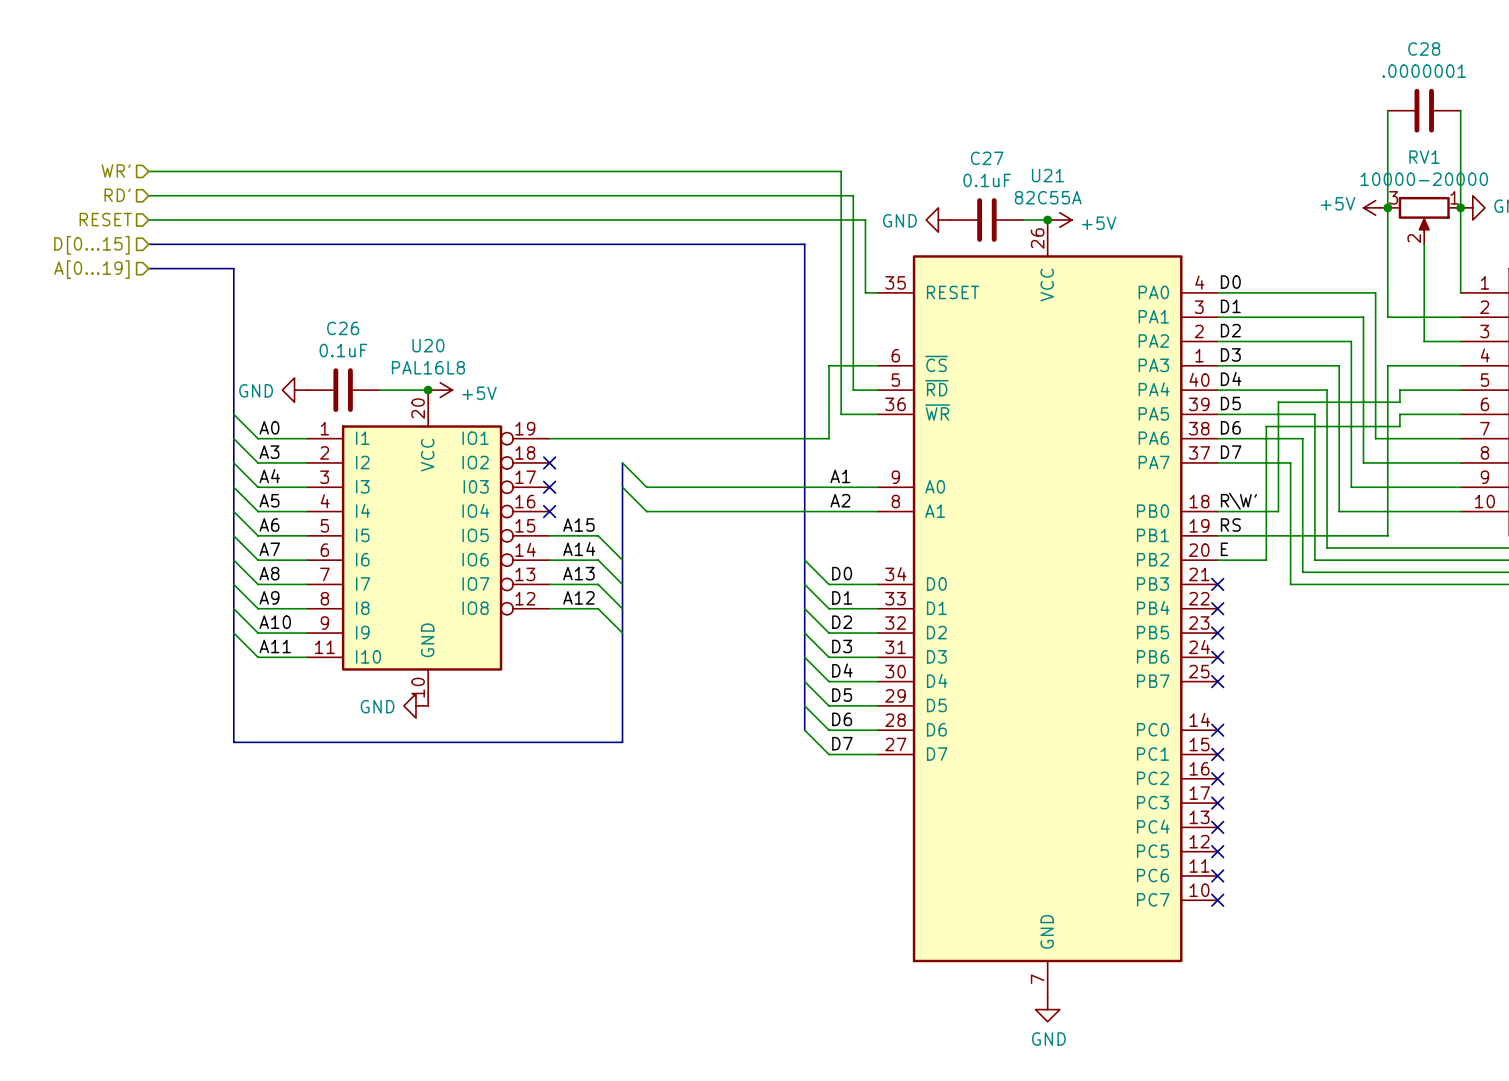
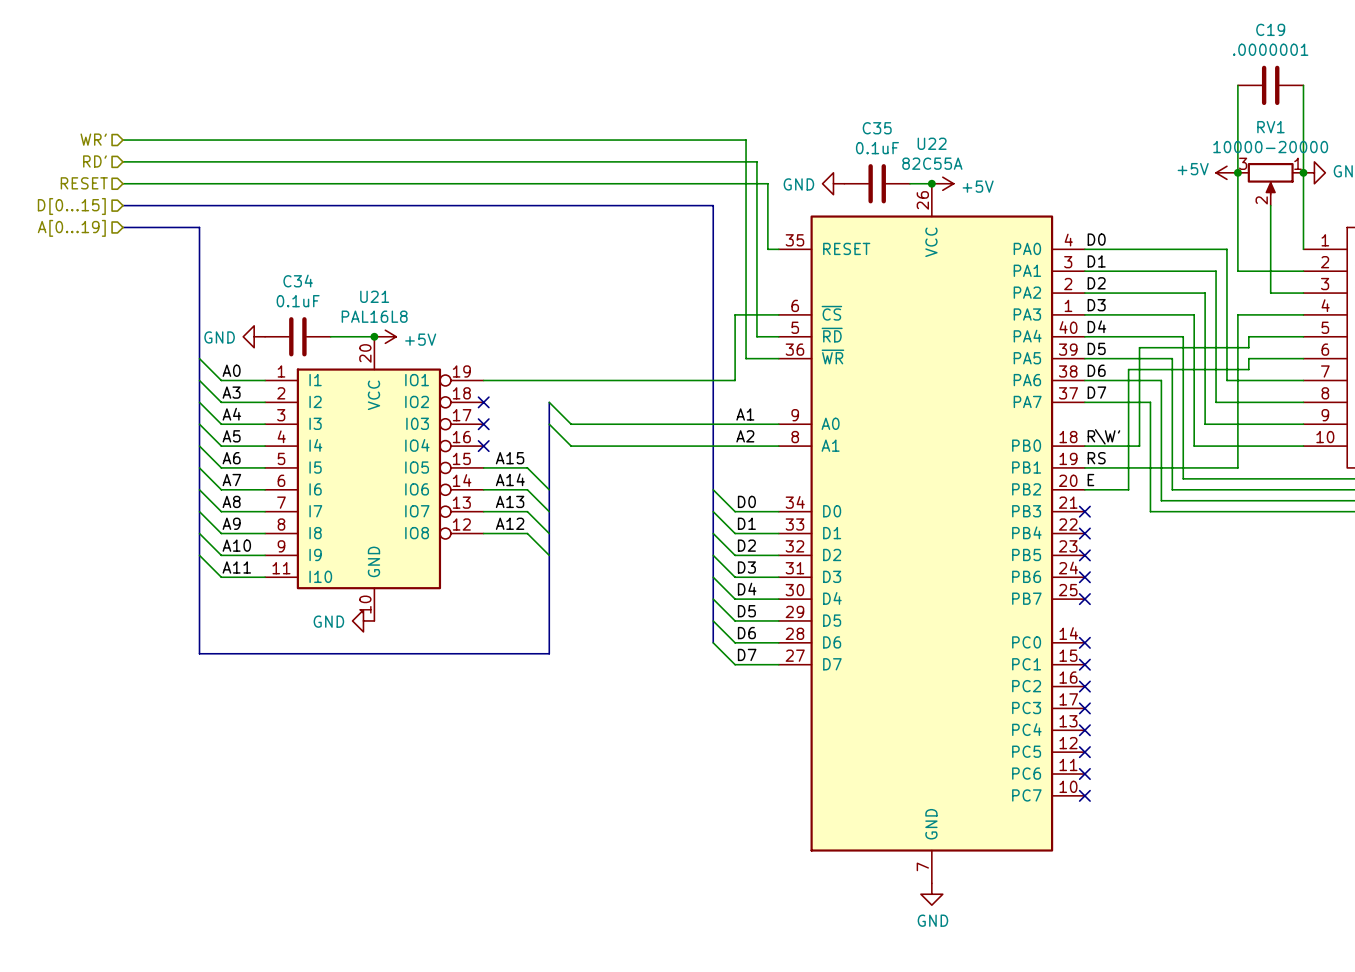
C28 name: C28 (1424, 49) -> C19 (1270, 29)
C27 name: C27 (987, 158) -> C35 (877, 128)
U21 name: U21 (1047, 175) -> U22 (932, 143)
C26 name: C26 (343, 328) -> C34 (298, 281)
U20 name: U20 (428, 345) -> U21 (374, 296)

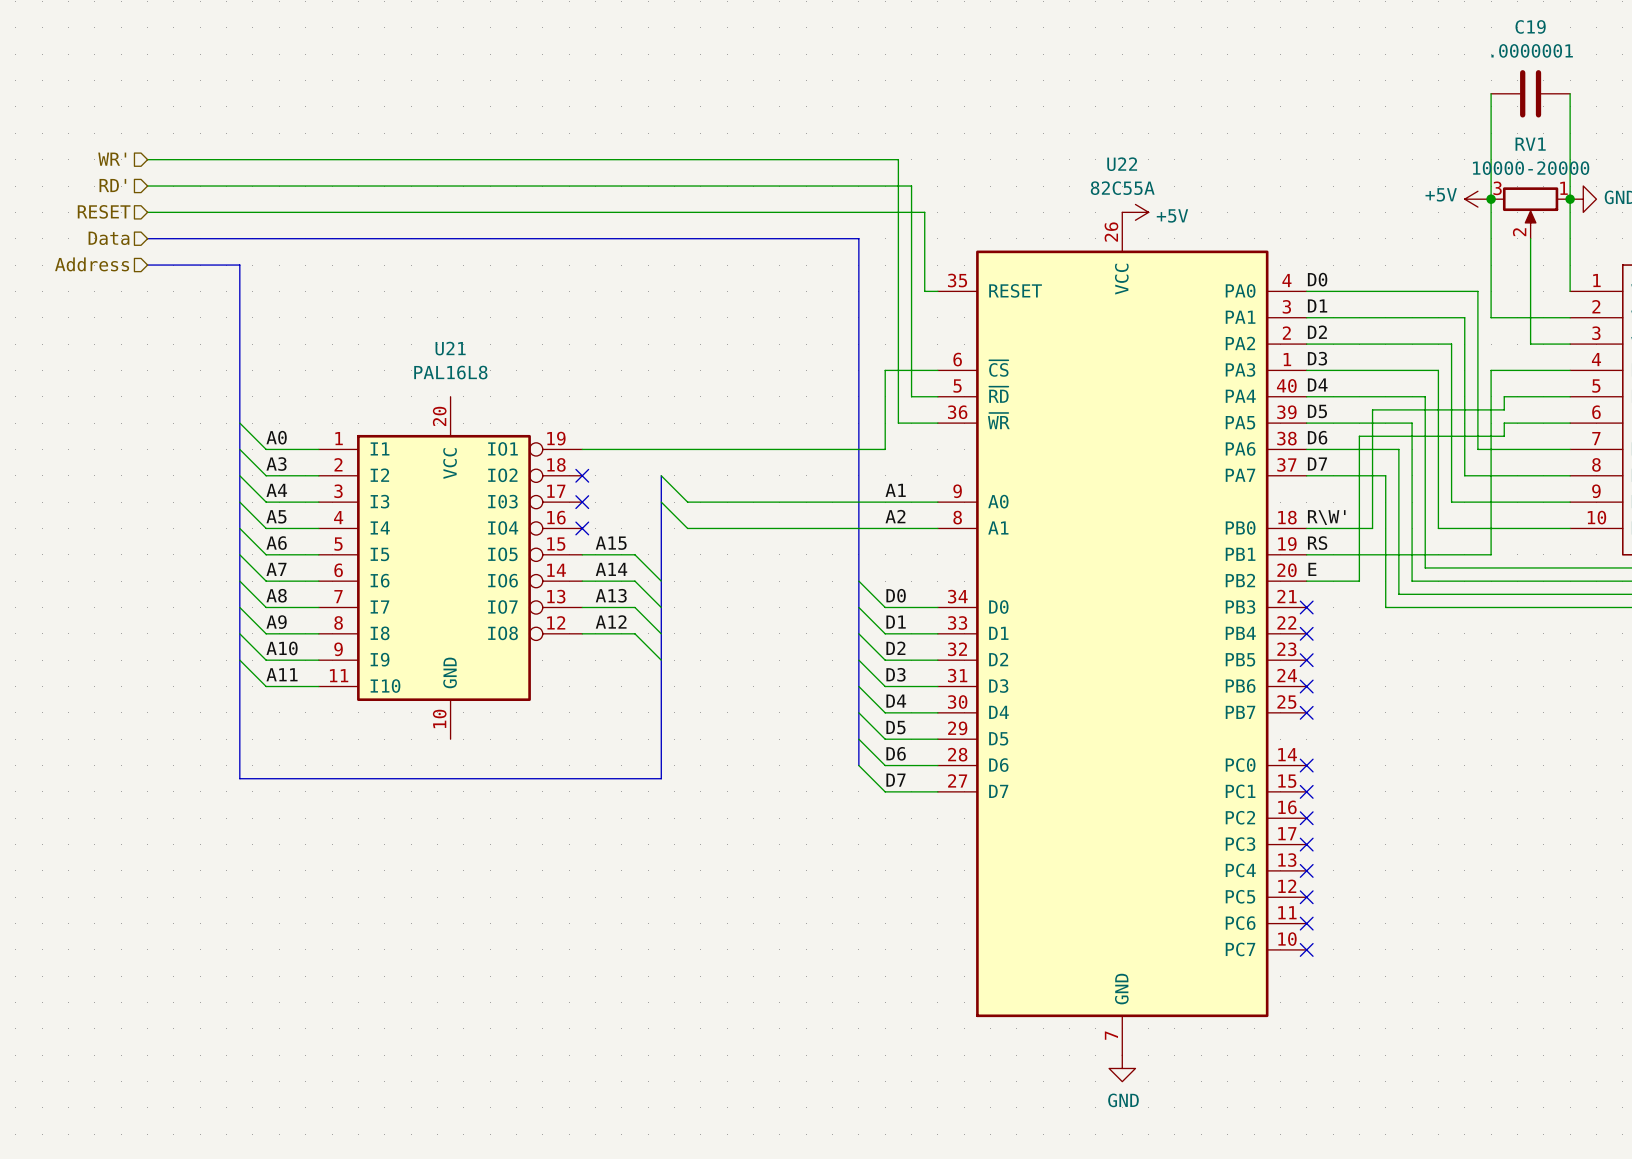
power symbol: GND (833, 183) -> none
C35: 0.1uF (877, 183) -> none
wire: (909, 183) (931, 183) -> none
junction: (931, 183) -> none
hierarchical label: D[0...15] (71, 206) -> Data (108, 238)
hierarchical label: A[0...19] (71, 228) -> Address (92, 264)
power symbol: GND (254, 336) -> none
C34: 0.1uF (297, 336) -> none
wire: (330, 336) (374, 336) -> none
junction: (374, 336) -> none
power symbol: +5V (385, 336) -> none
power symbol: GND (363, 620) -> none

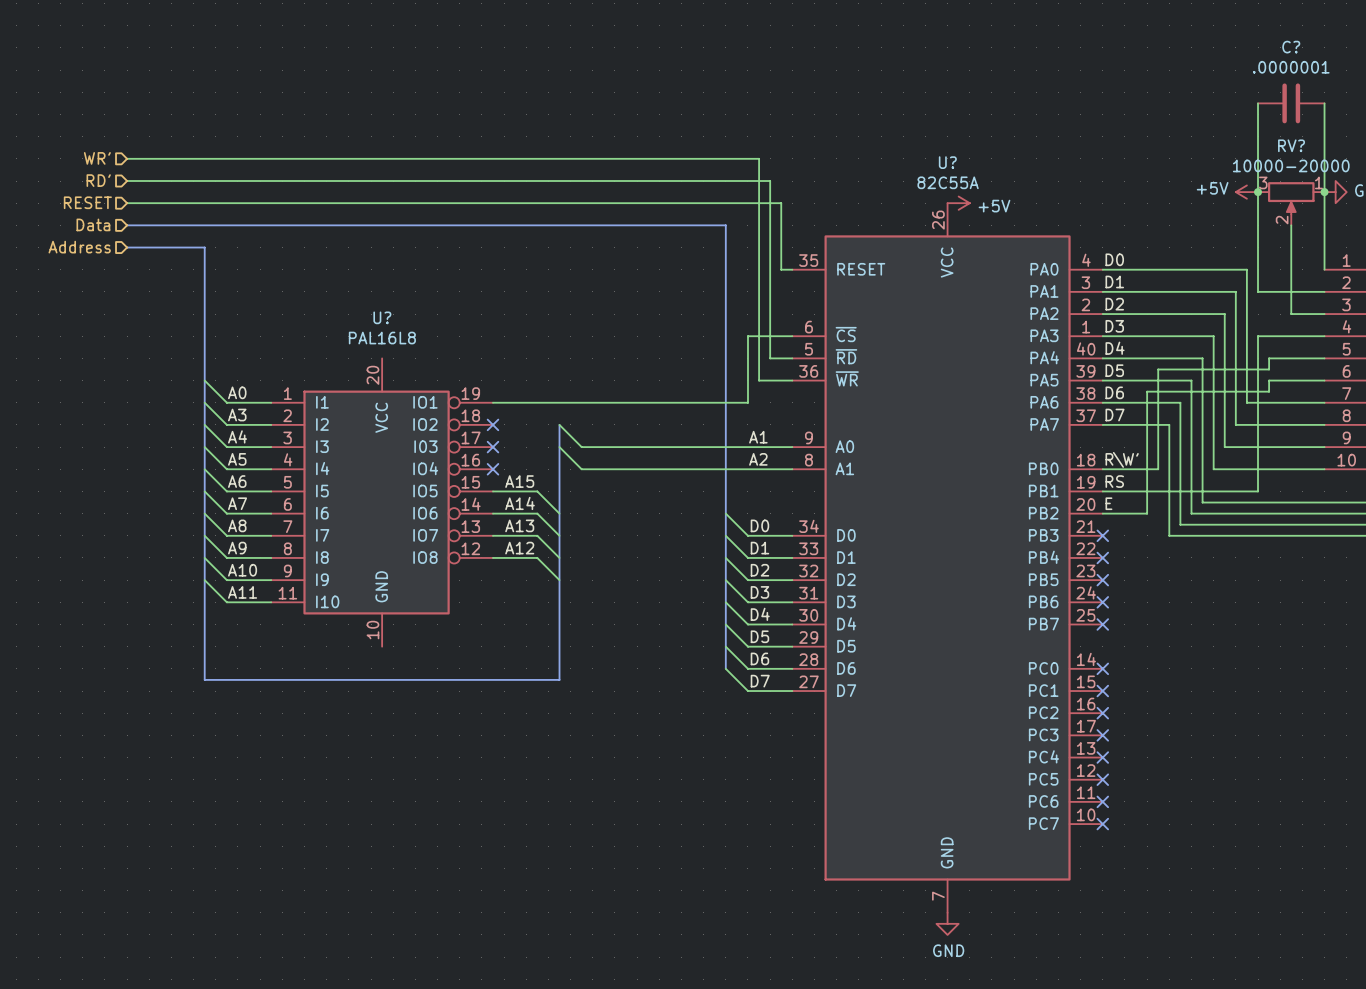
C19 name: C19 (1530, 26) -> C? (1291, 47)
RV1 name: RV1 (1530, 144) -> RV? (1291, 145)
U22 name: U22 (1122, 164) -> U? (947, 162)
U21 name: U21 (450, 348) -> U? (382, 317)

